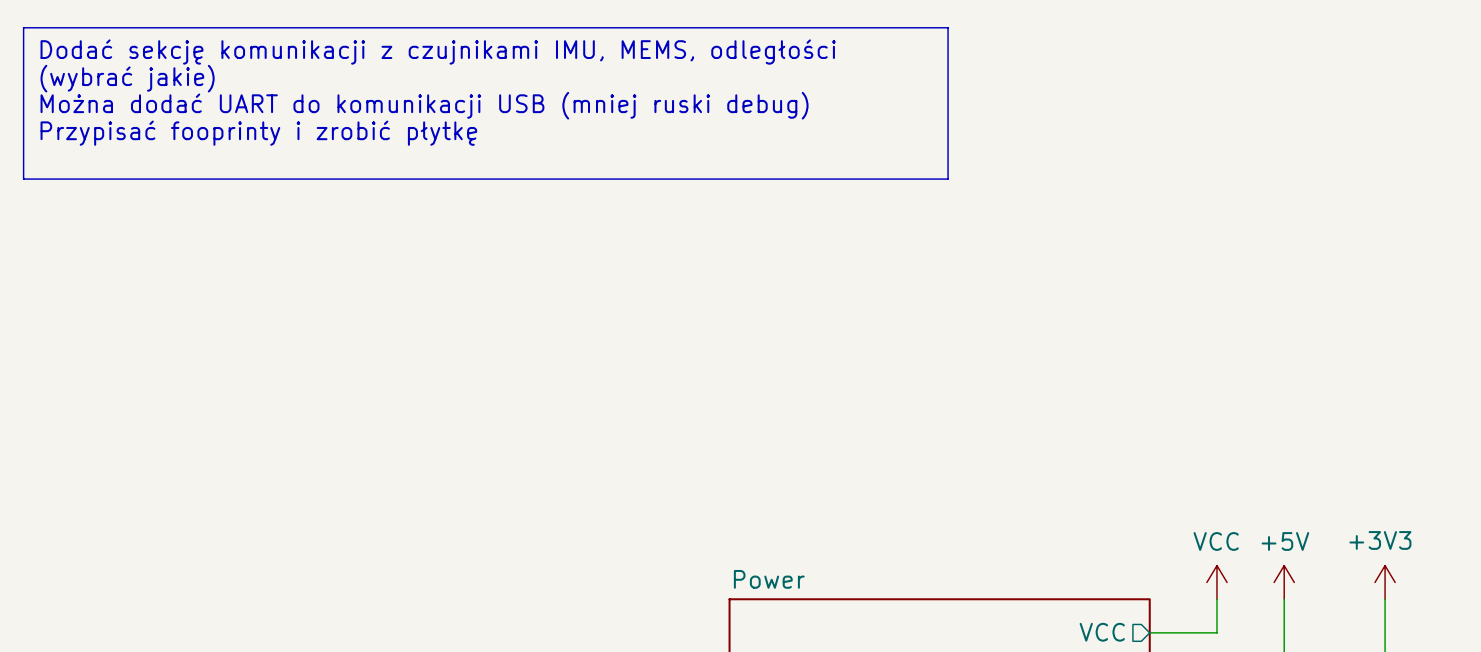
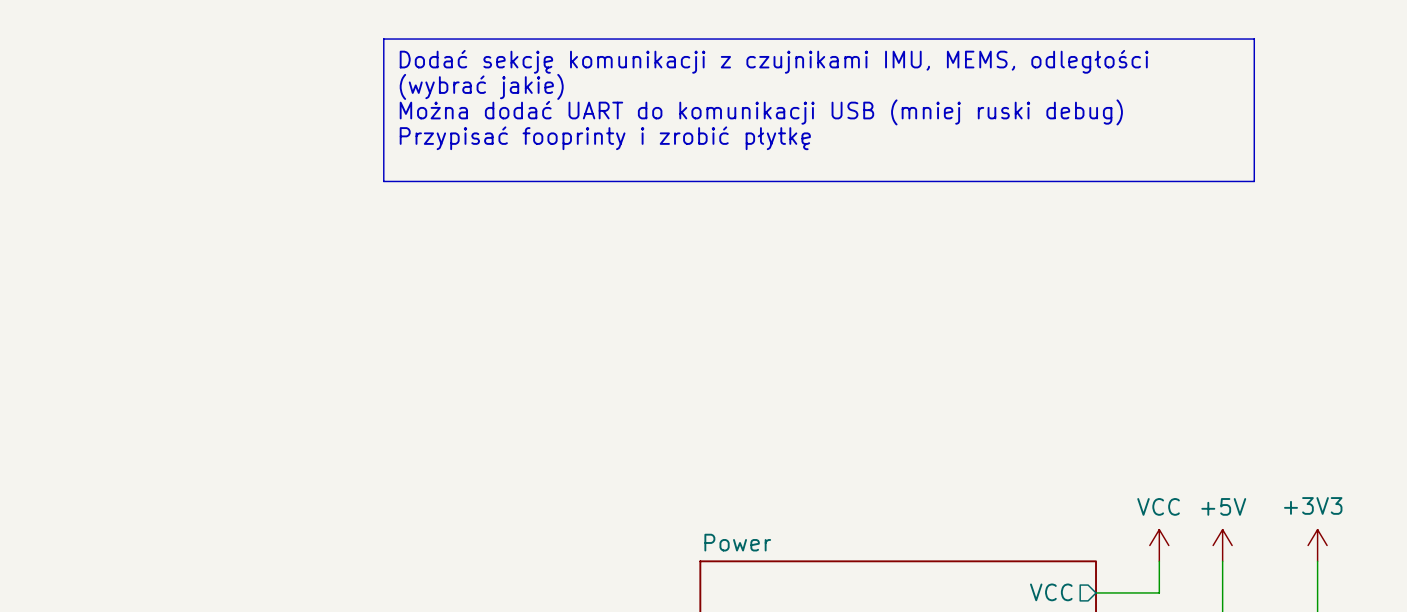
line: (23, 27) (948, 27) (948, 179) (23, 179) (23, 27) -> none
line: none -> (383, 39) (1254, 39) (1254, 181) (383, 181) (383, 39)
text: Dodać sekcję komunikacji z czujnikami IMU, MEMS, odległości (438, 51) -> none
text: none -> Dodać sekcję komunikacji z czujnikami IMU, MEMS, odległości (774, 61)
text: (wybrać jakie) (127, 78) -> none
text: none -> (wybrać jakie) (481, 86)
text: Można dodać UART do komunikacji USB (mniej ruski debug) (424, 105) -> none
text: none -> Można dodać UART do komunikacji USB (mniej ruski debug) (761, 112)
text: Przypisać fooprinty i zrobić płytkę (258, 133) -> none
text: none -> Przypisać fooprinty i zrobić płytkę (605, 138)

